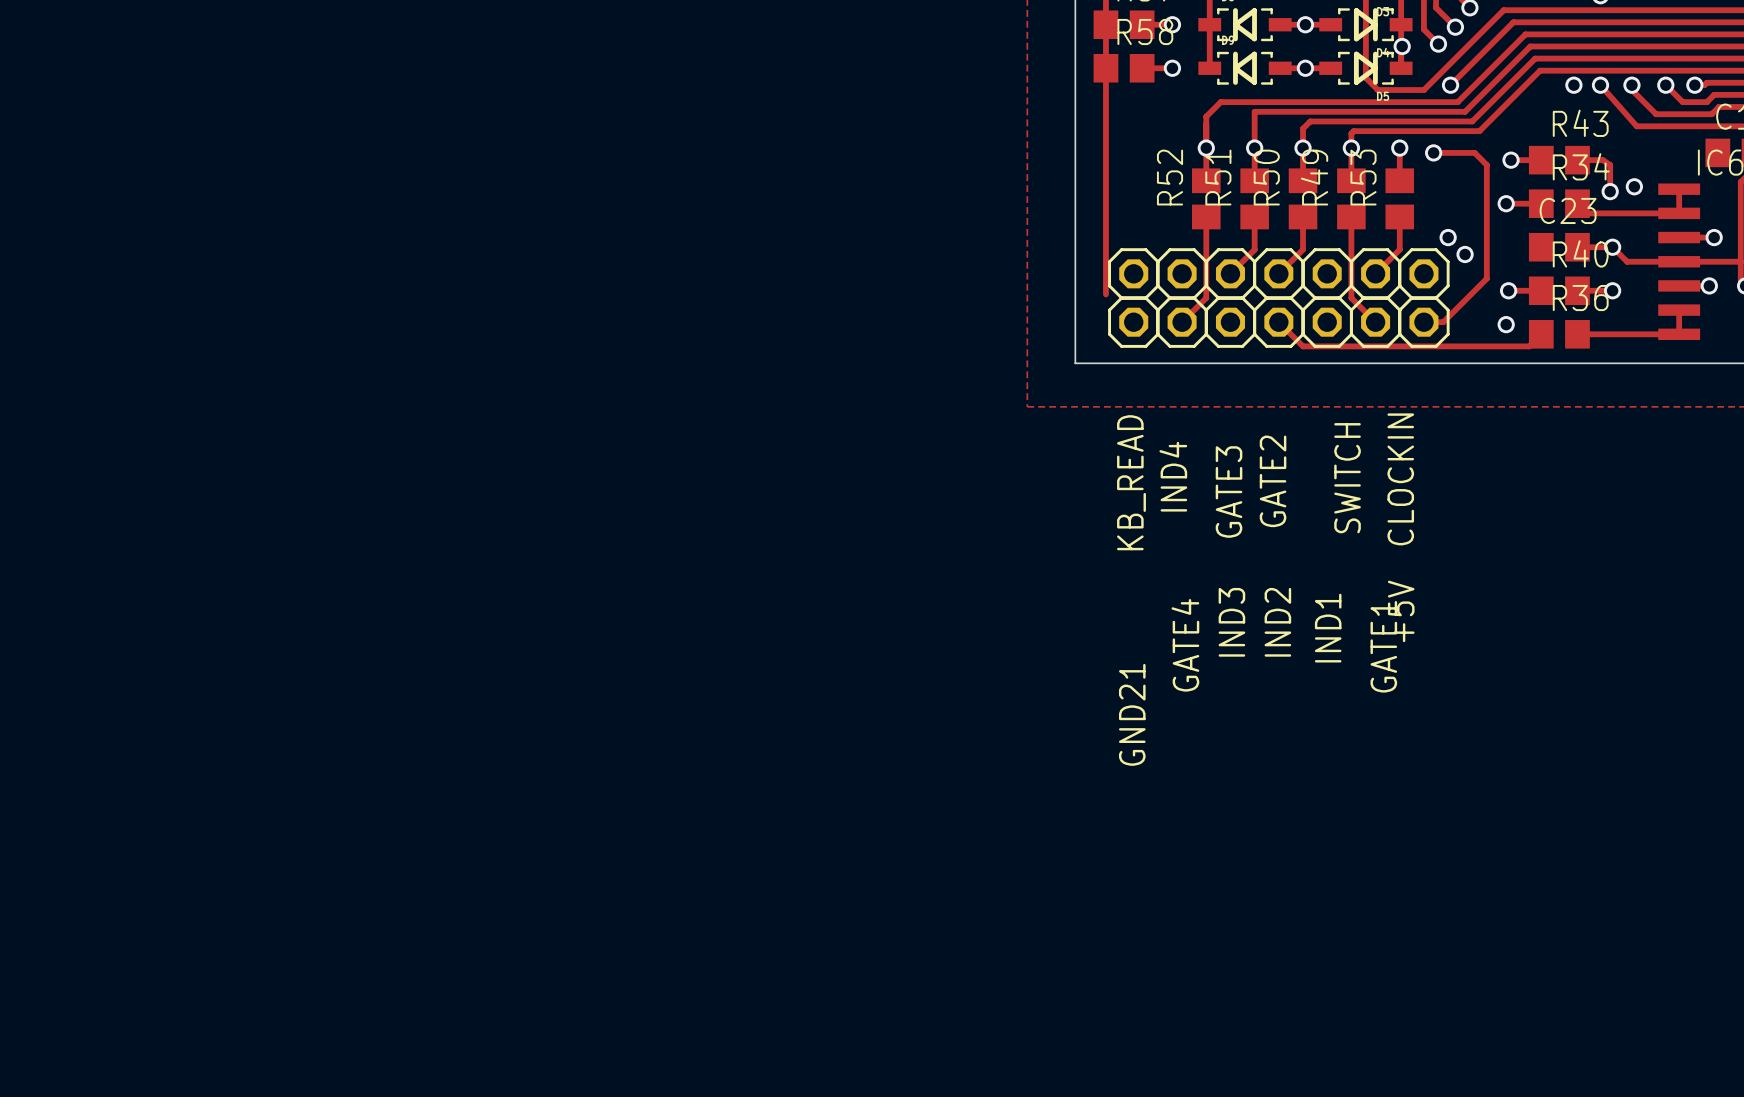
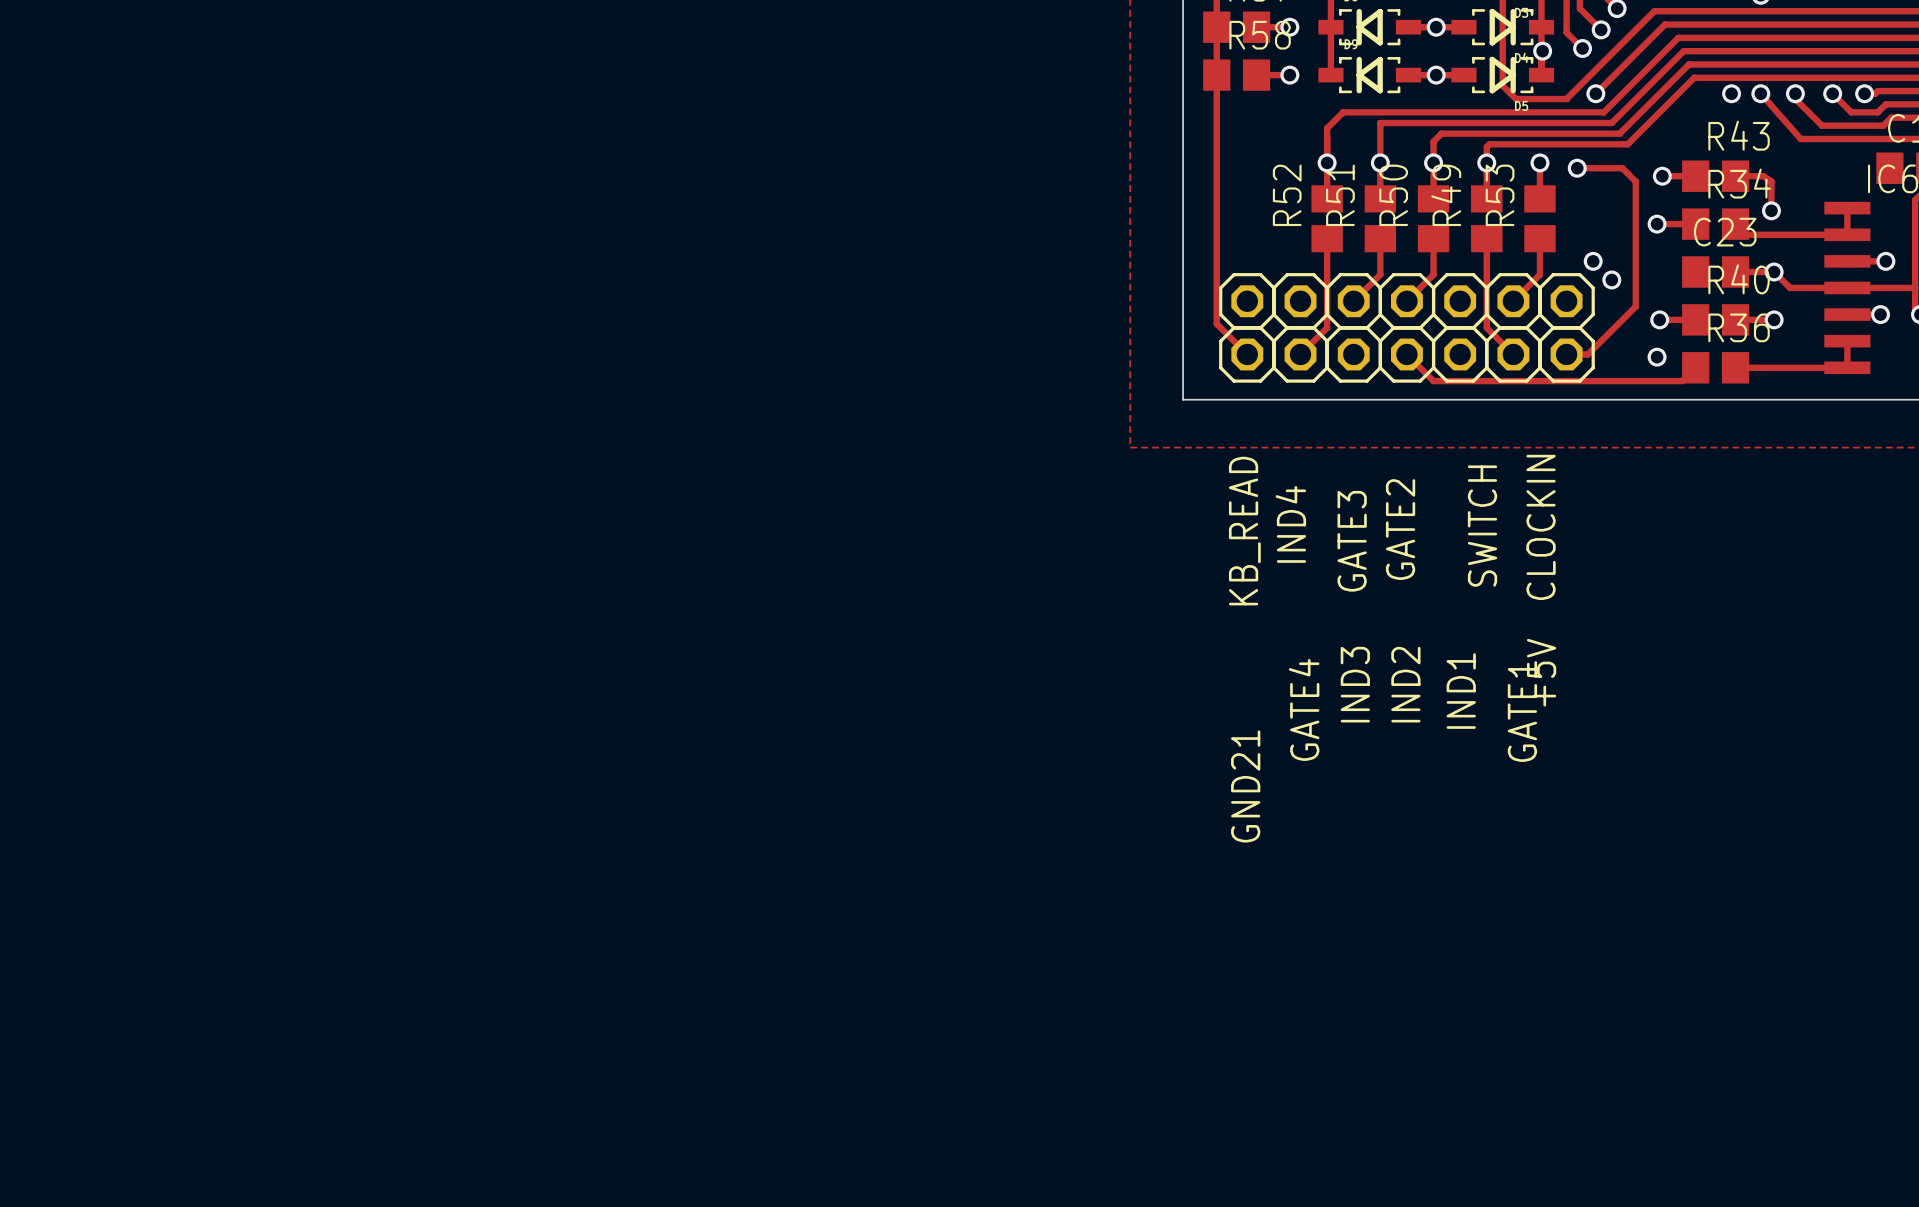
via: (1634, 186) -> none
track: none -> (1216, 323) (1247, 354)

